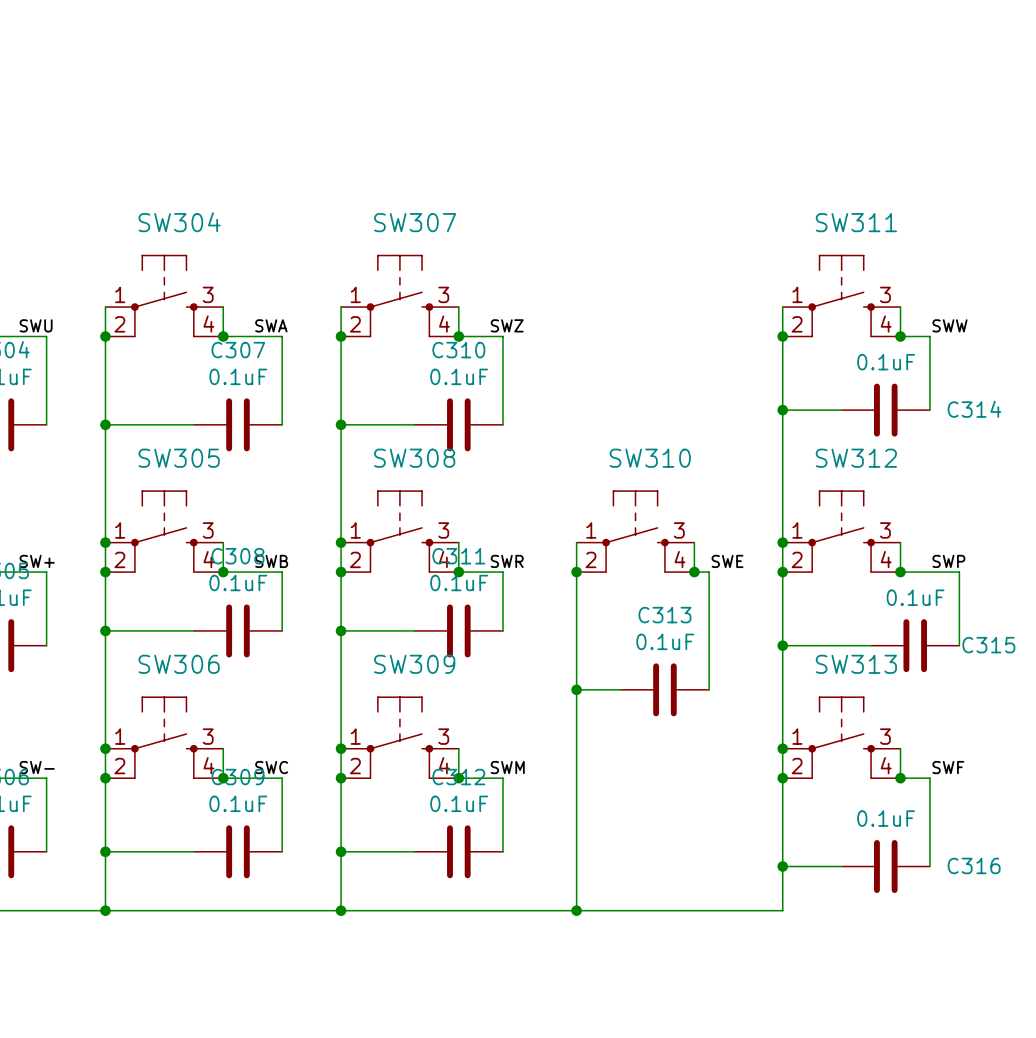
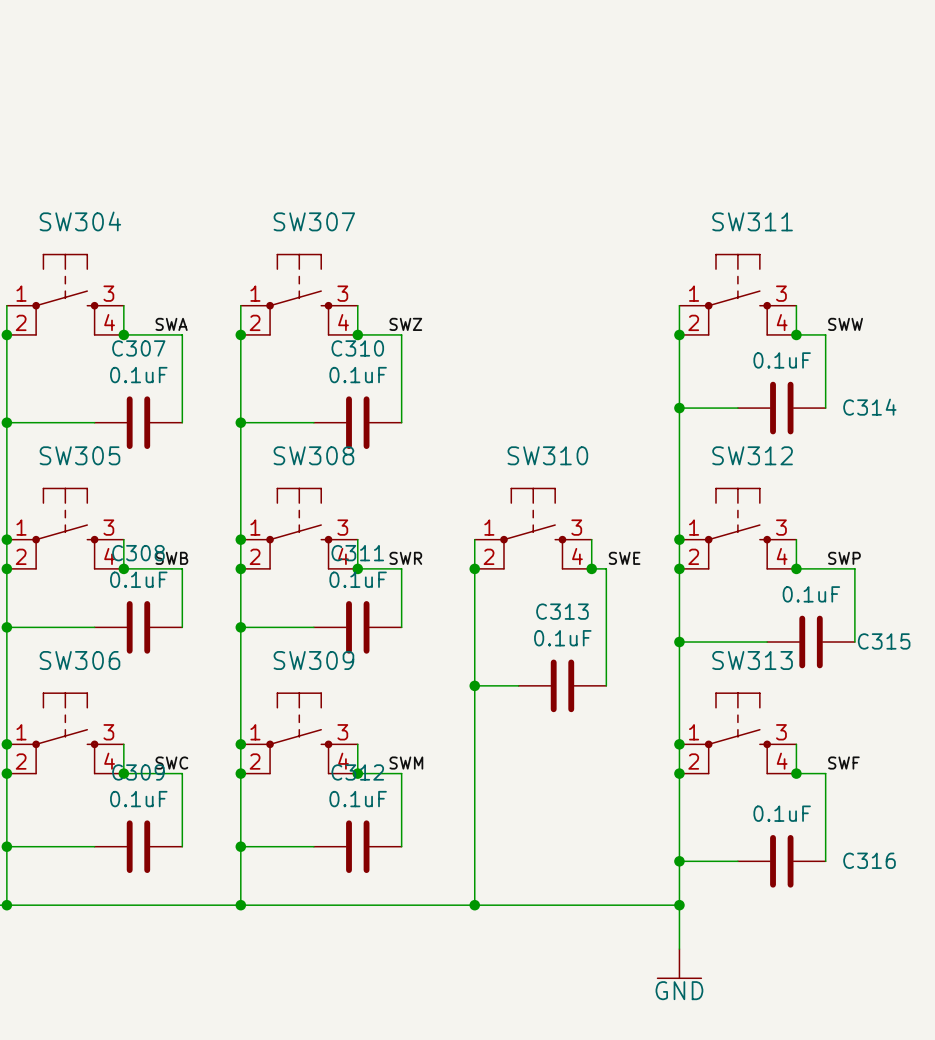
wire: none -> (679, 905) (679, 949)
junction: none -> (679, 905)
power symbol: none -> GND (679, 963)

